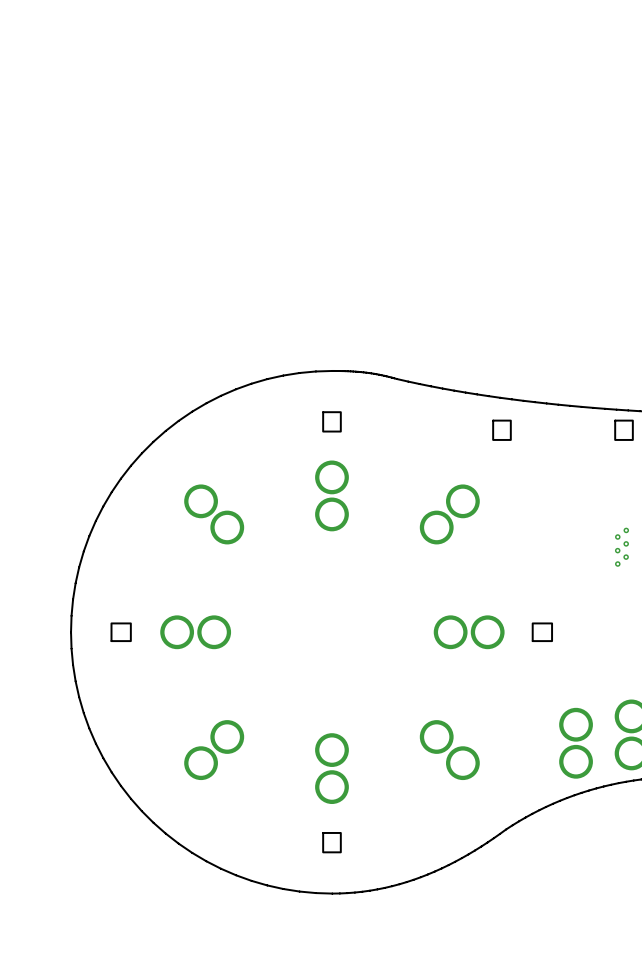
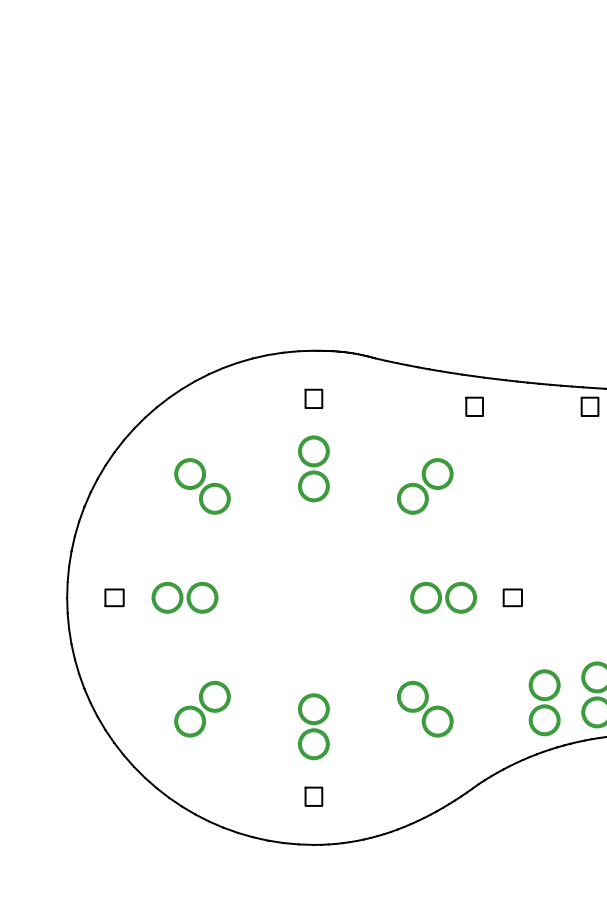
via: (626, 530) -> none
via: (617, 536) -> none
via: (626, 543) -> none
via: (617, 550) -> none
via: (626, 557) -> none
via: (617, 564) -> none

